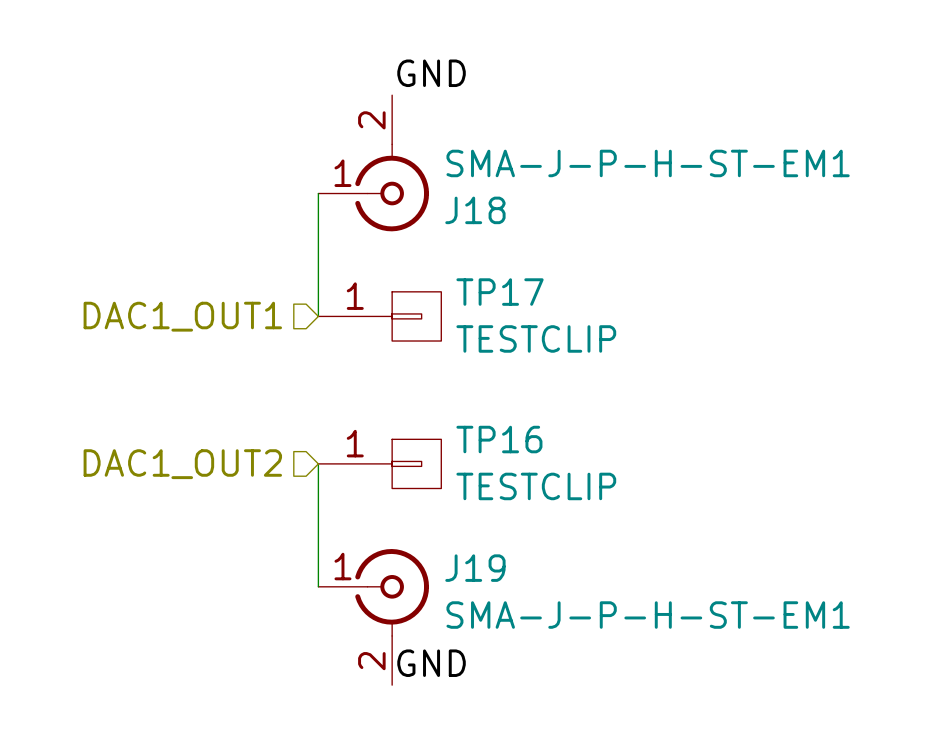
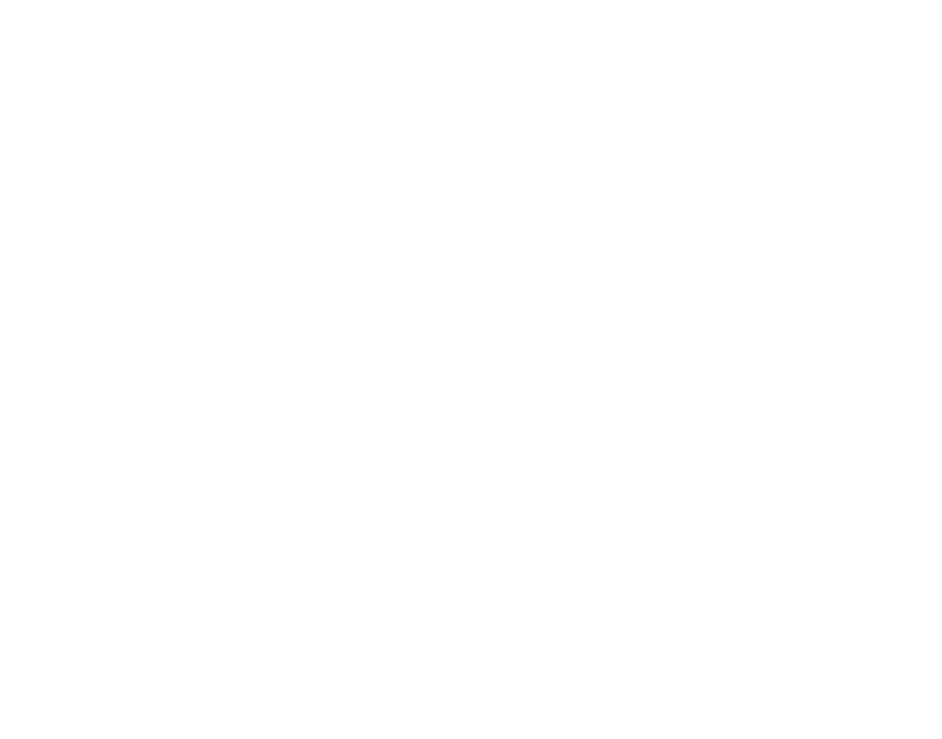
label: GND (431, 73) -> none
J18: SMA-J-P-H-ST-EM1 (373, 163) -> none
wire: (318, 193) (318, 316) -> none
hierarchical label: DAC1_OUT1 (182, 316) -> none
TP17: TESTCLIP (379, 316) -> none
wire: (318, 463) (318, 586) -> none
TP16: TESTCLIP (379, 463) -> none
hierarchical label: DAC1_OUT2 (182, 464) -> none
J19: SMA-J-P-H-ST-EM1 (373, 617) -> none
label: GND (431, 663) -> none

